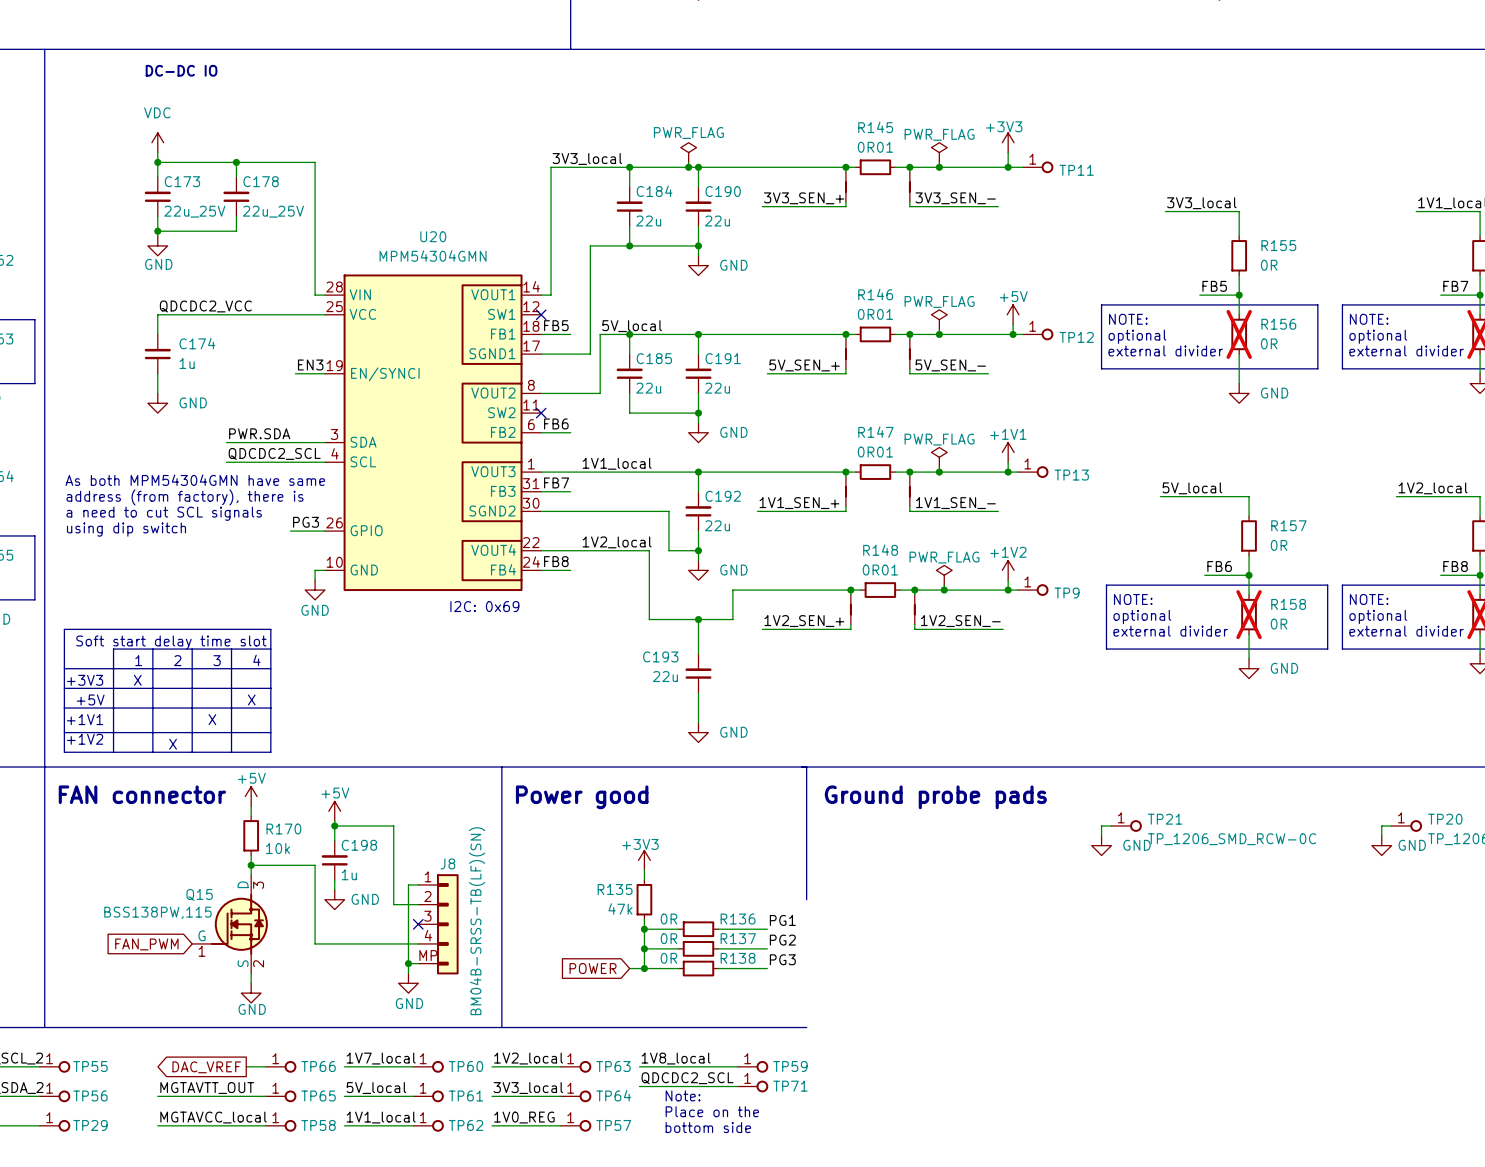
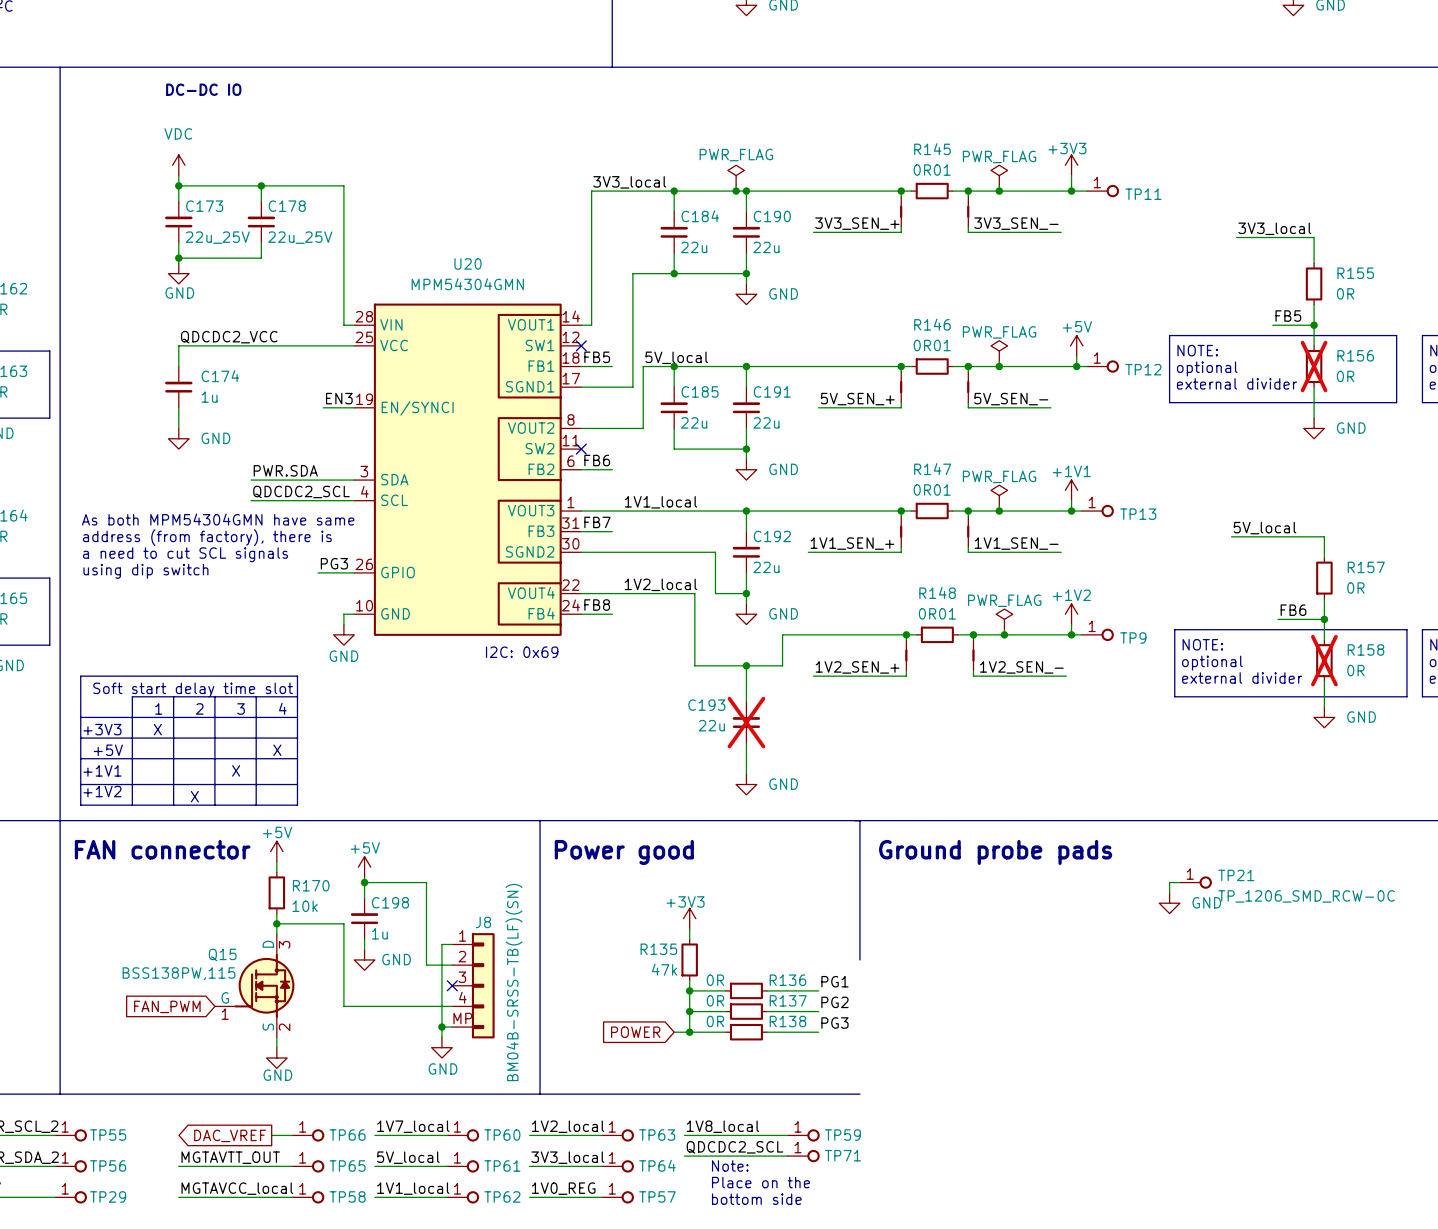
C193 do-not-place cross: none -> (746, 722)

